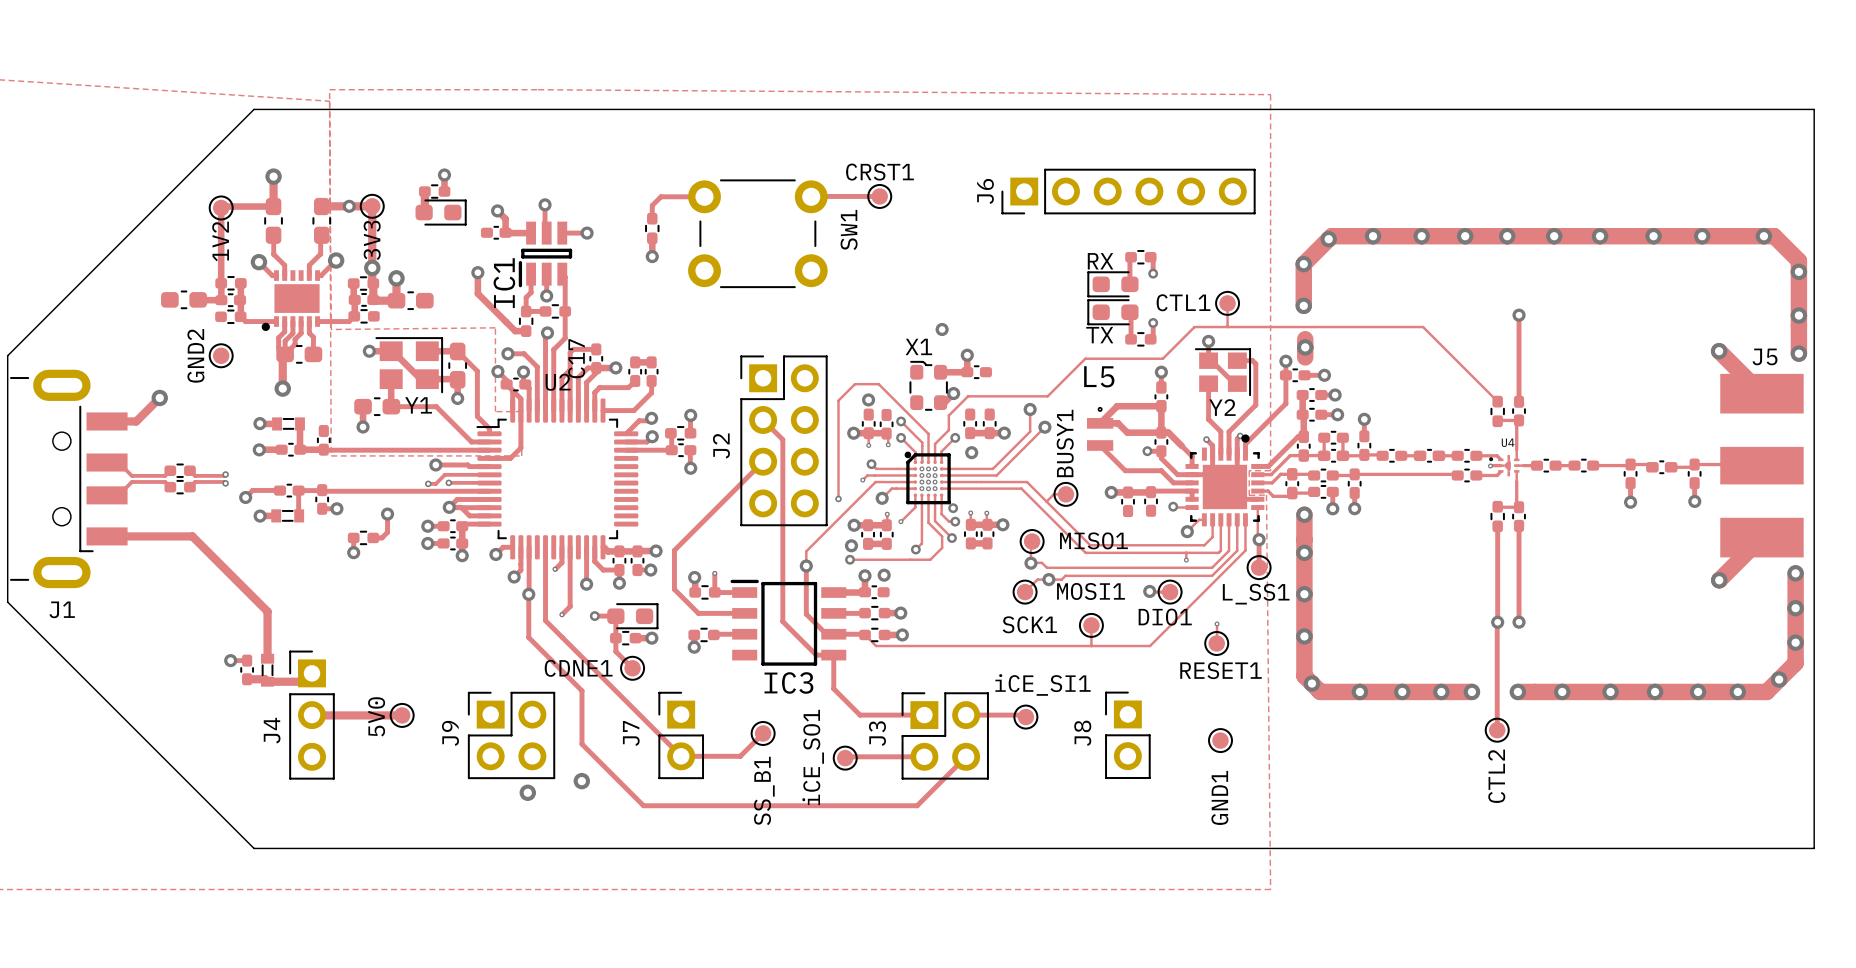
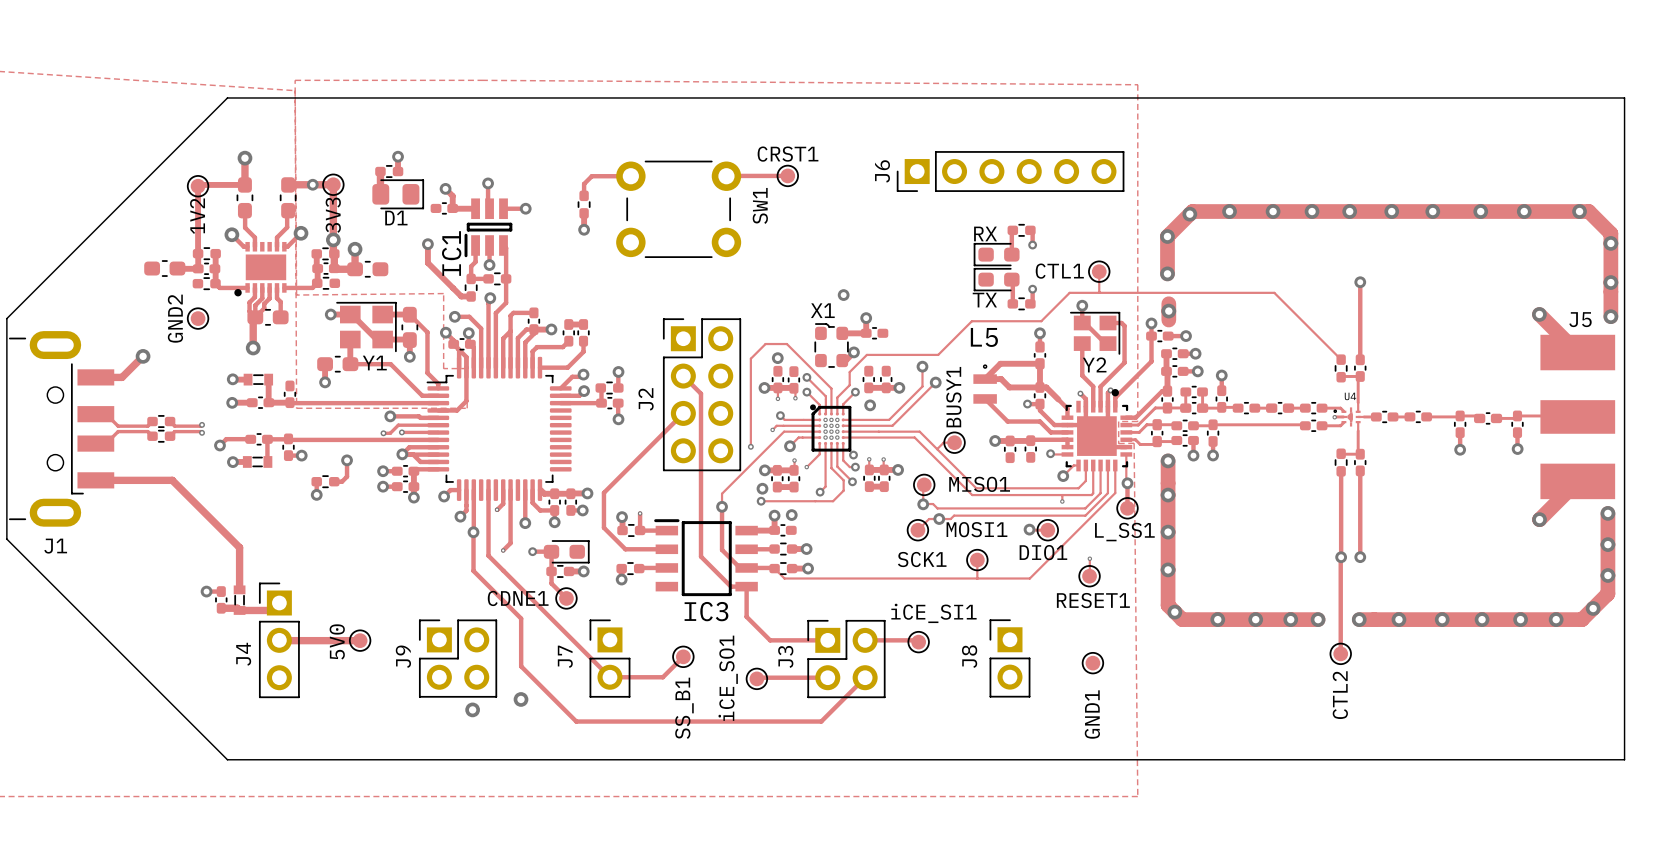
part: (441, 212) -> none
D1: none -> (398, 194)
C17 name: C17 (576, 358) -> none
U2 name: U2 (558, 382) -> none

